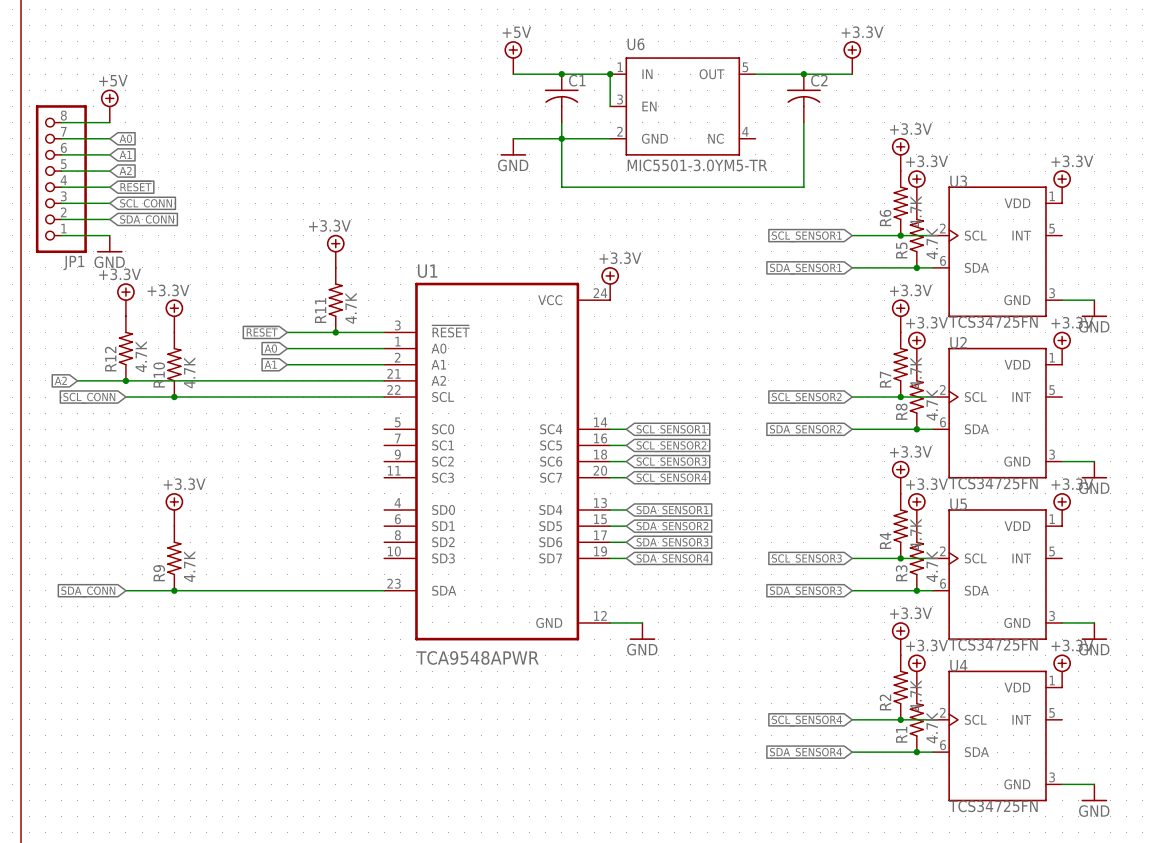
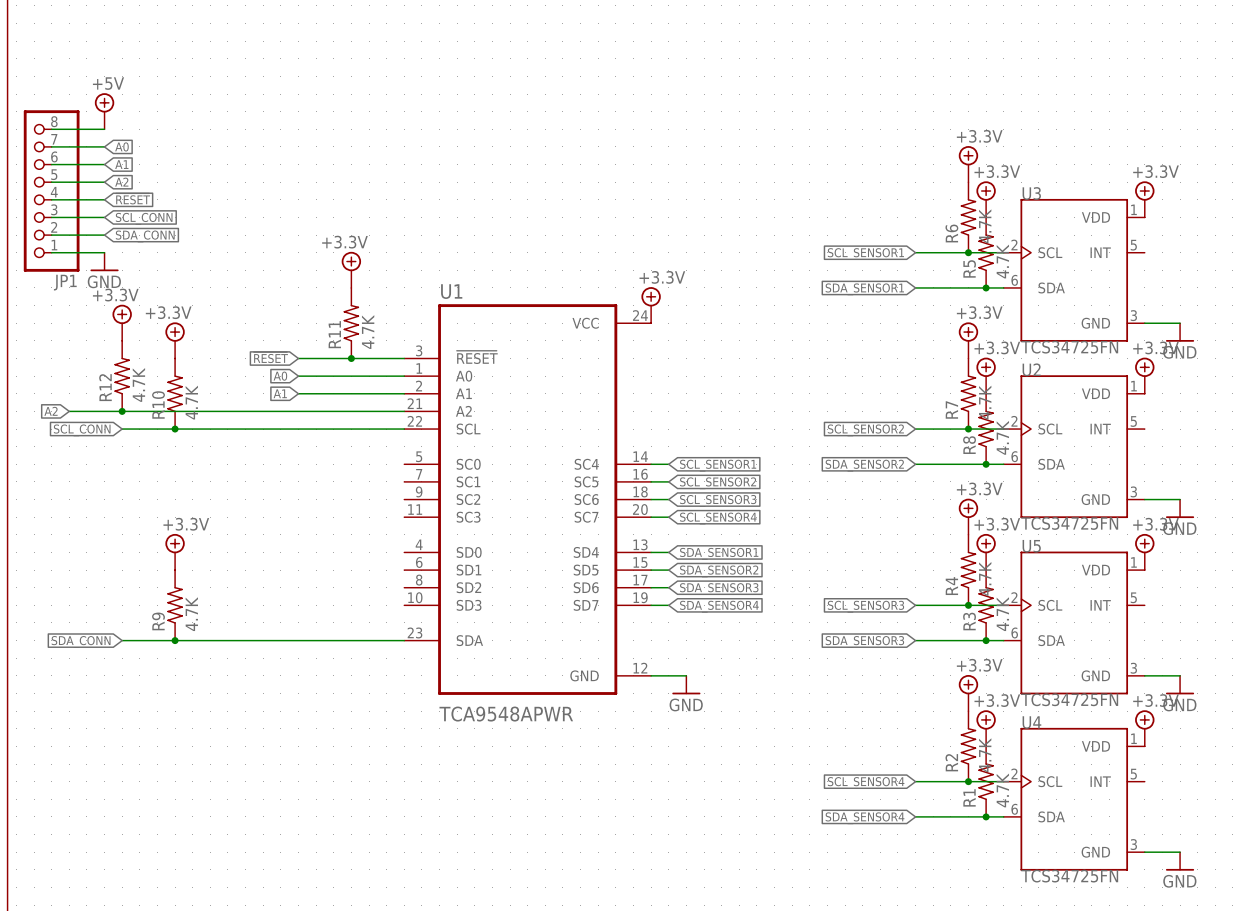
power symbol: +5V (513, 57) -> none
power symbol: +3.3V (852, 57) -> none
wire: (513, 74) (610, 74) (610, 106) -> none
junction: (561, 74) -> none
junction: (610, 74) -> none
wire: (755, 74) (852, 74) -> none
junction: (803, 74) -> none
C1: (561, 98) -> none
C2: (803, 98) -> none
U6: MIC5501-3.0YM5-TR (682, 106) -> none
wire: (561, 122) (561, 187) (803, 187) (803, 122) -> none
wire: (513, 138) (610, 138) -> none
junction: (561, 138) -> none
power symbol: GND (513, 147) -> none

